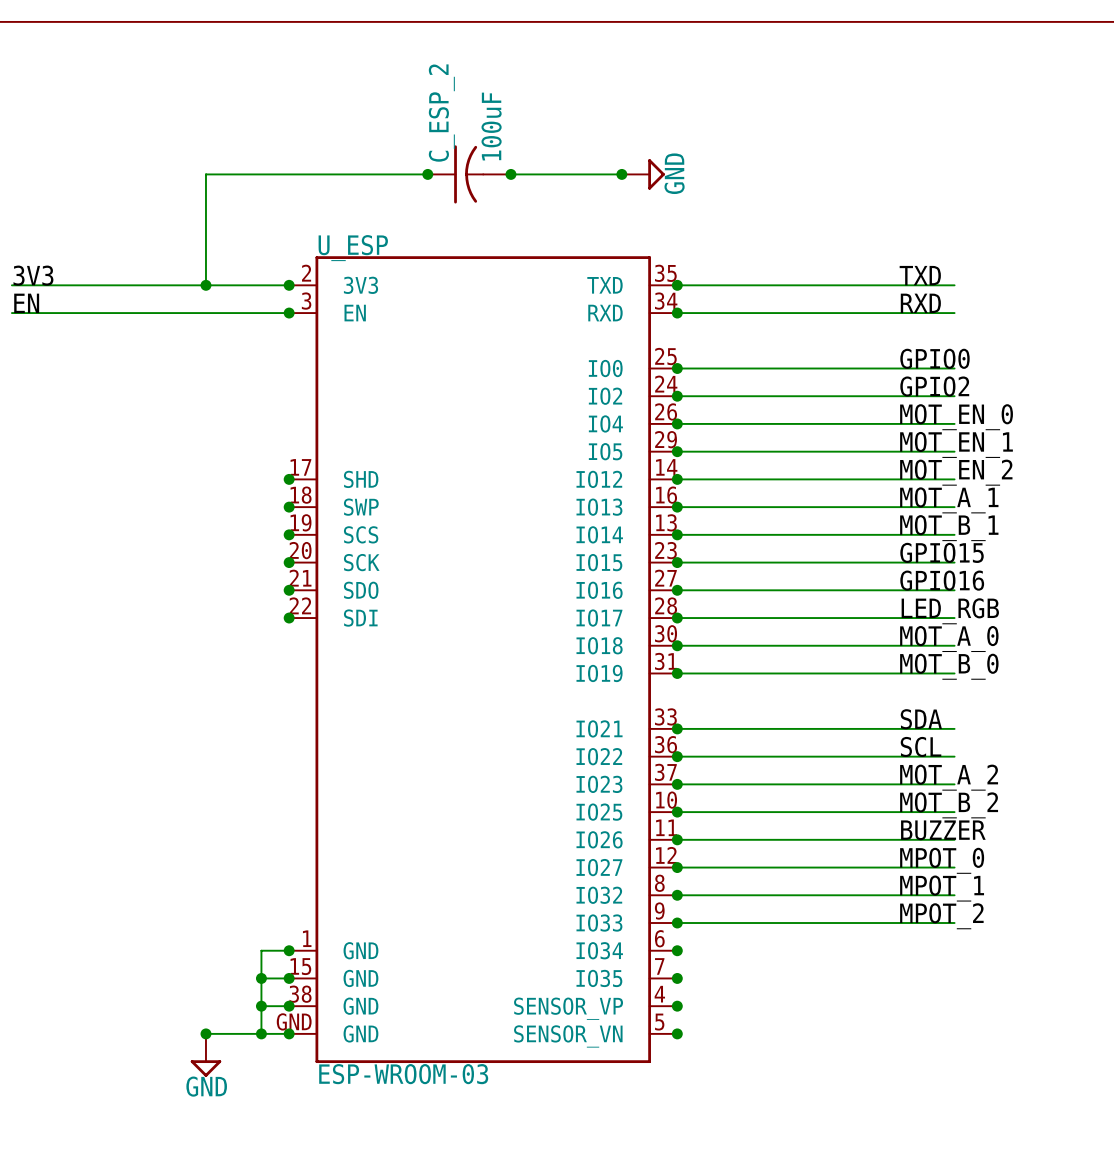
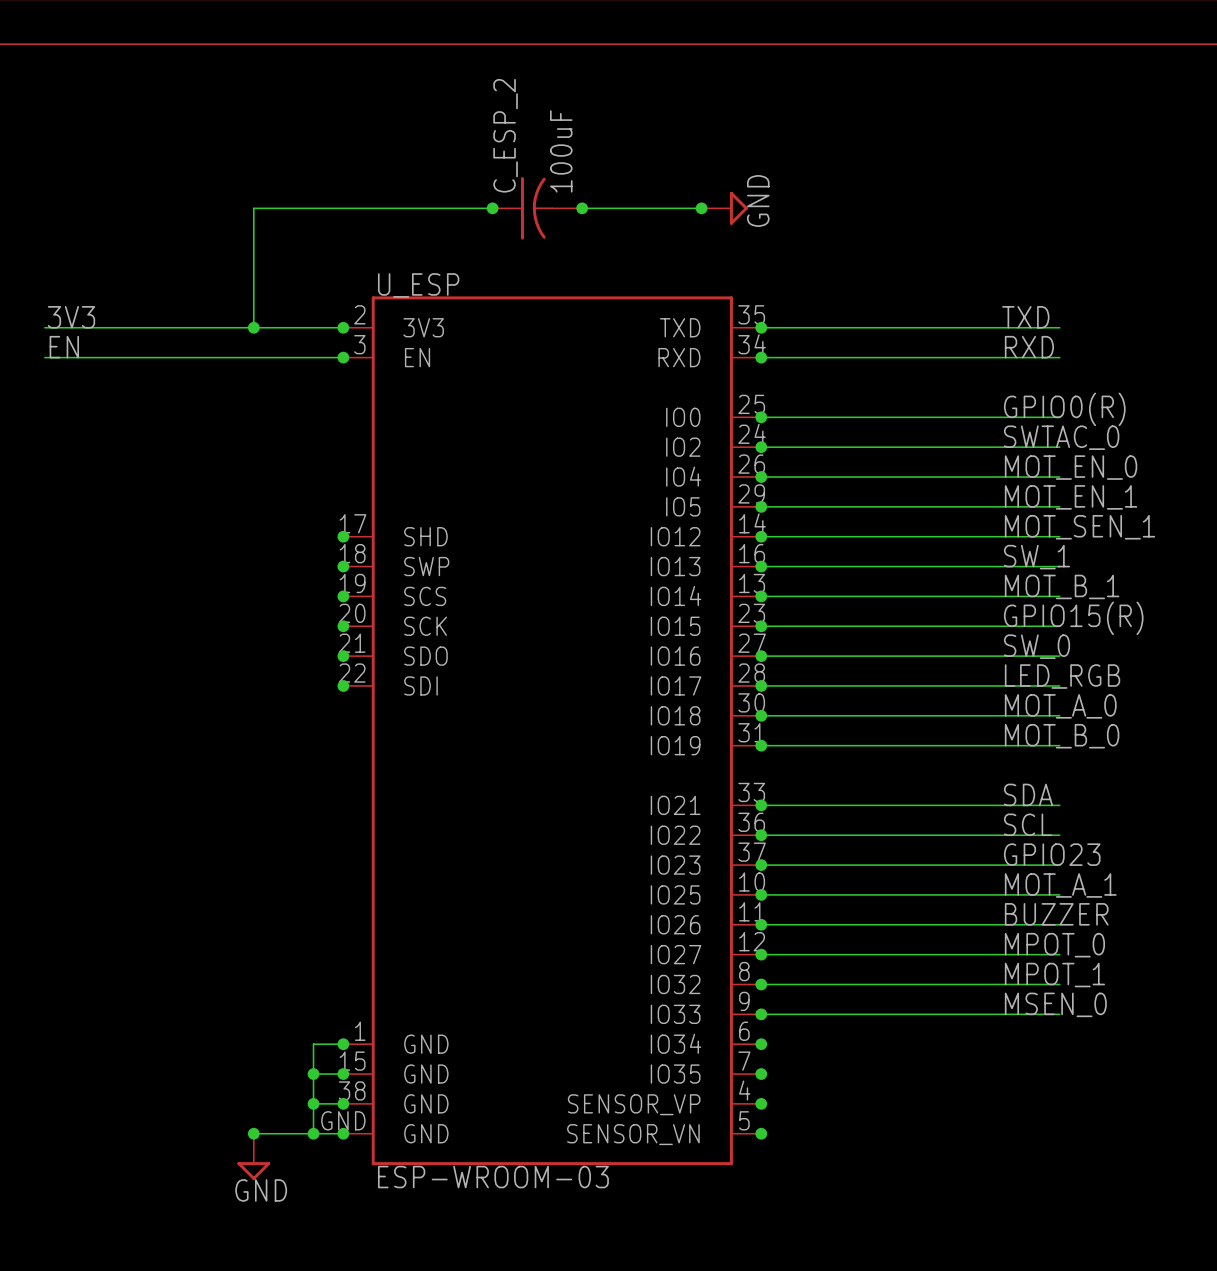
label: GPIO0 (935, 358) -> GPIO0(R) (1064, 409)
label: GPIO2 (934, 386) -> SWTAC_0 (1061, 437)
label: MOT_EN_2 (956, 472) -> MOT_SEN_1 (1080, 527)
label: MOT_A_1 (949, 500) -> SW_1 (1037, 557)
label: GPIO15 (942, 552) -> GPIO15(R) (1073, 618)
label: GPIO16 (942, 580) -> SW_0 (1037, 646)
label: MOT_A_2 (949, 777) -> GPIO23 (1052, 854)
label: MOT_B_2 (949, 805) -> MOT_A_1 (1060, 885)
label: MPOT_2 (941, 916) -> MSEN_0 (1055, 1004)

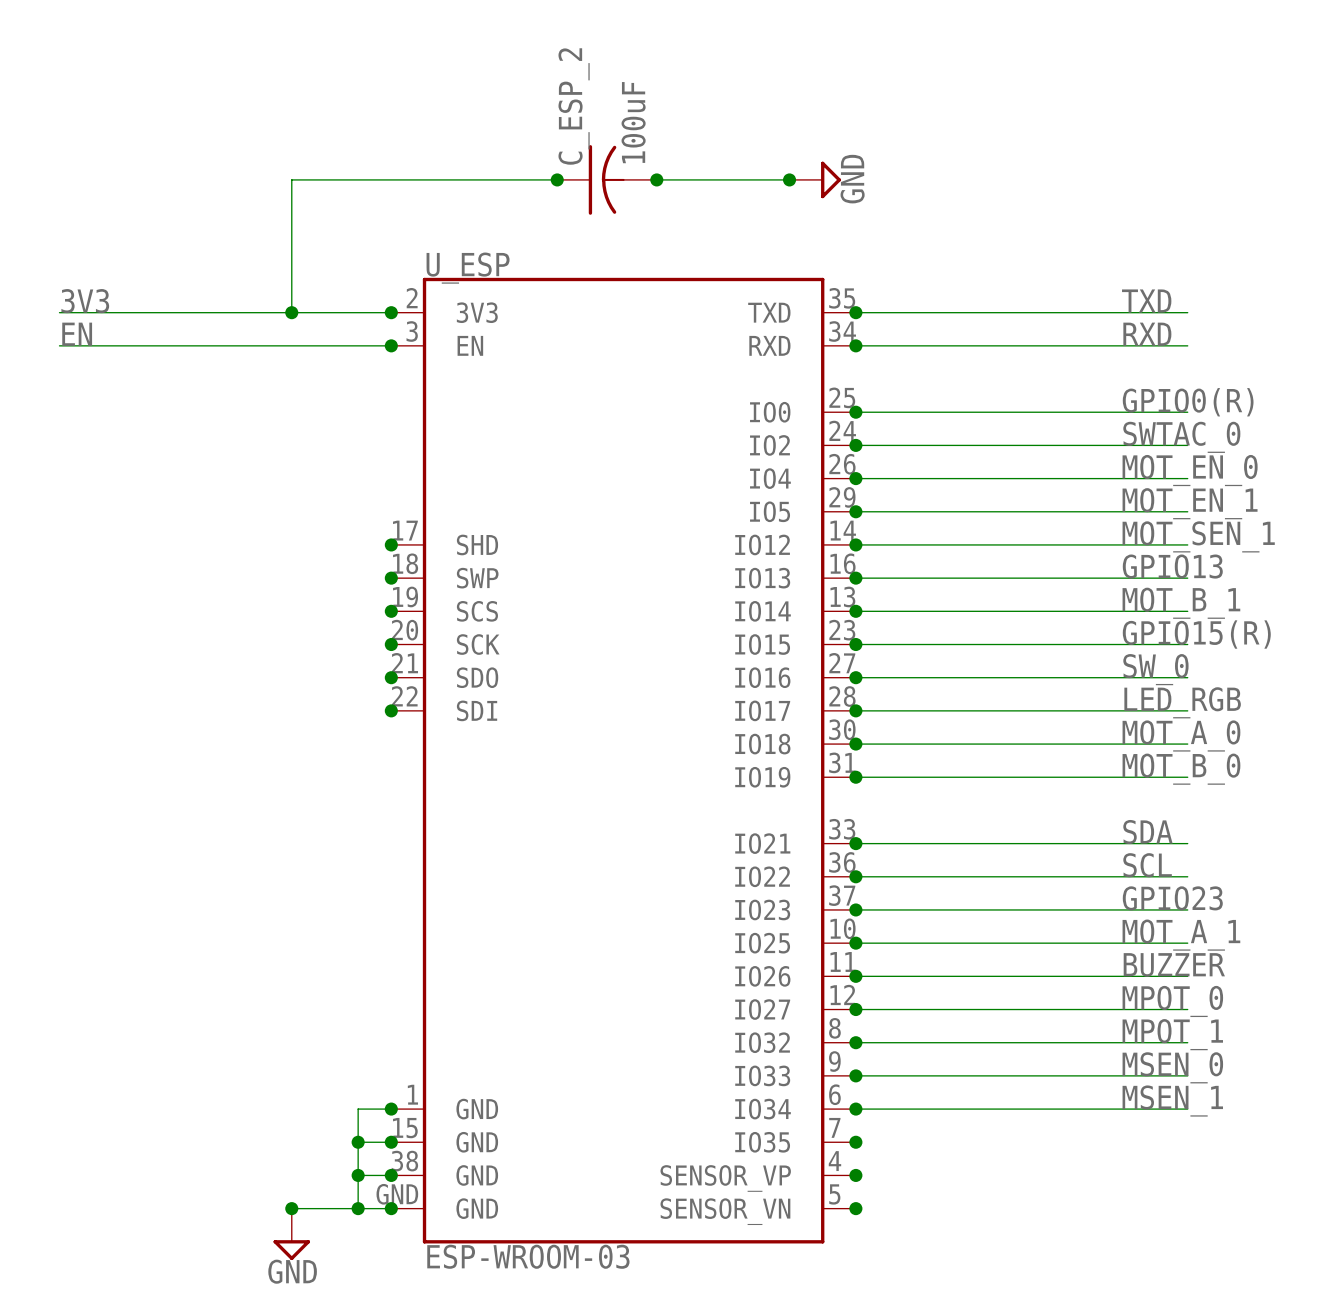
label: SW_1 (1037, 557) -> GPIO13 (1172, 566)
label: none -> MSEN_1 (1172, 1101)
wire: none -> (855, 1109) (1187, 1109)

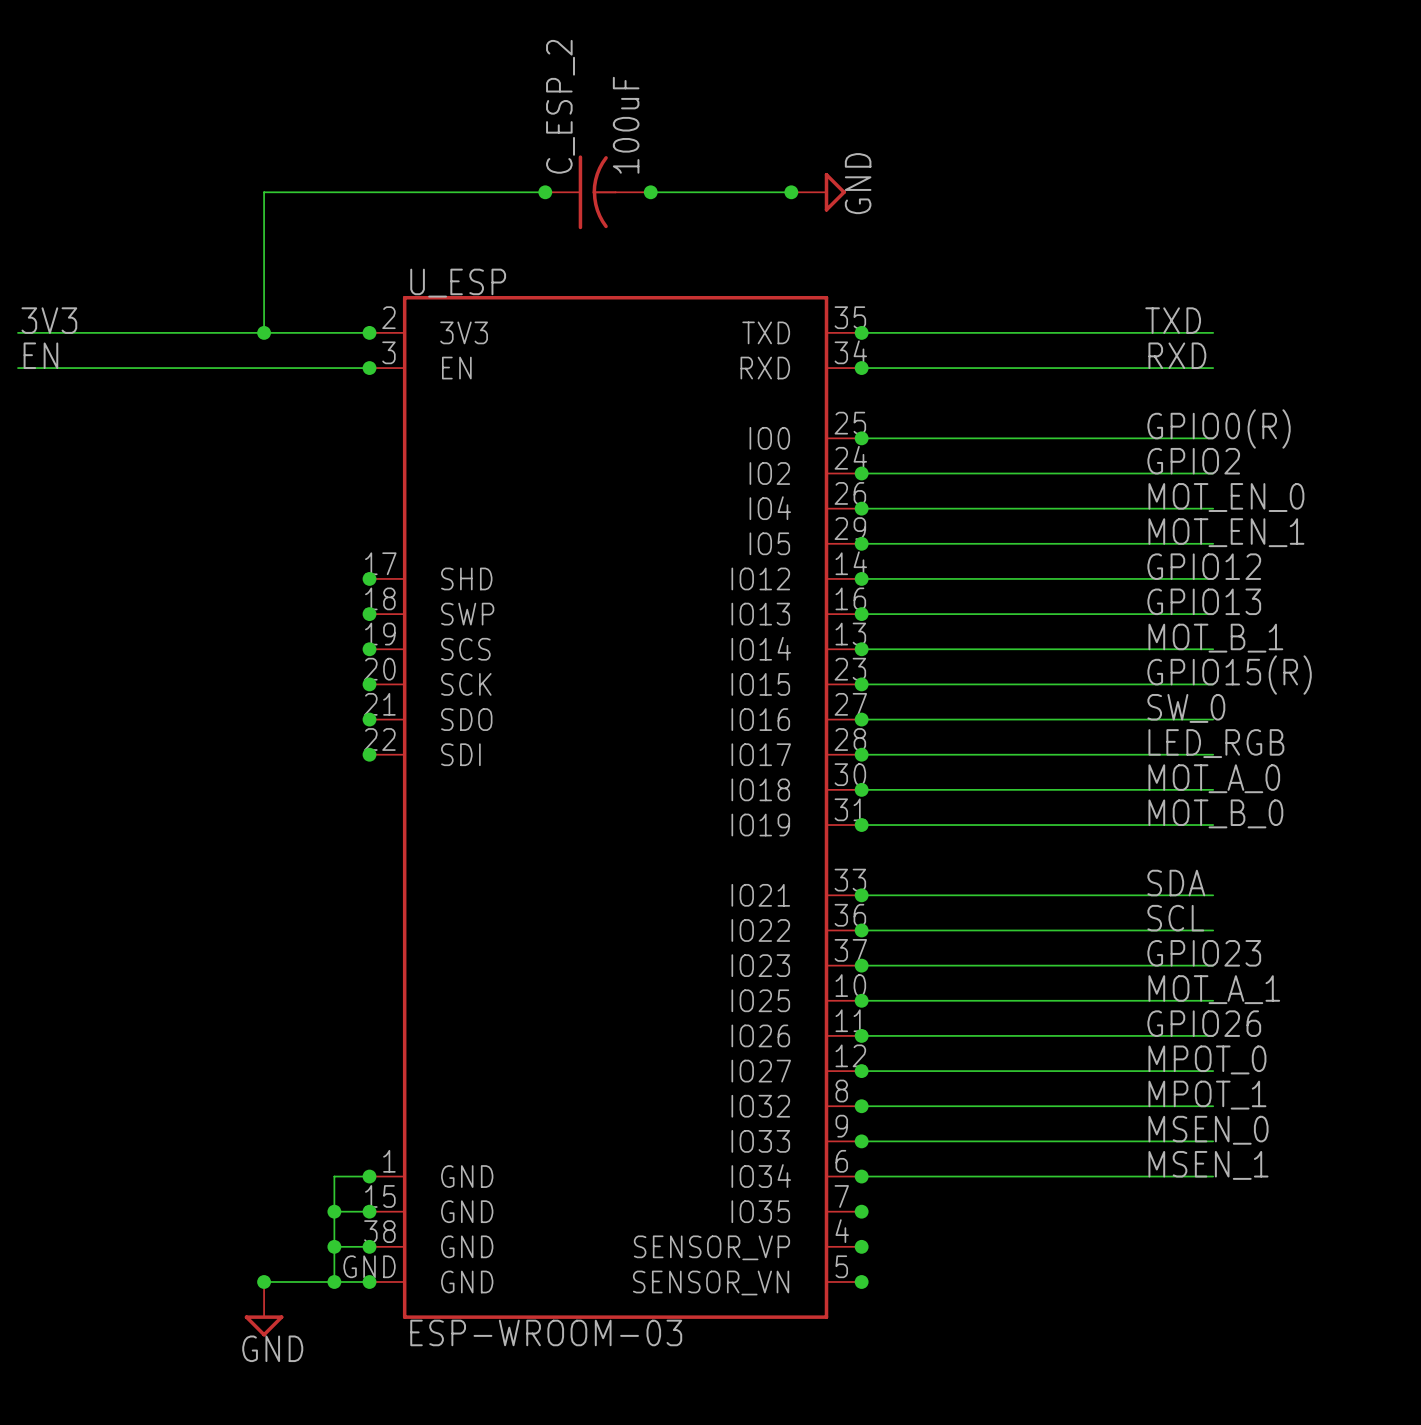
label: SWTAC_0 (1181, 437) -> GPIO2 (1193, 461)
label: MOT_SEN_1 (1198, 536) -> GPIO12 (1204, 566)
label: BUZZER (1174, 964) -> GPIO26 (1204, 1023)

